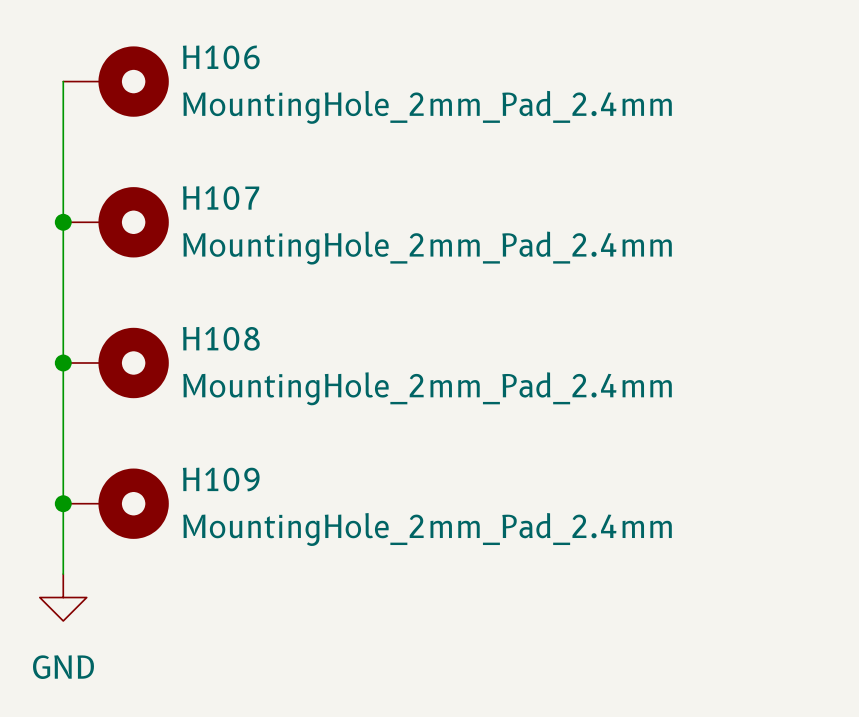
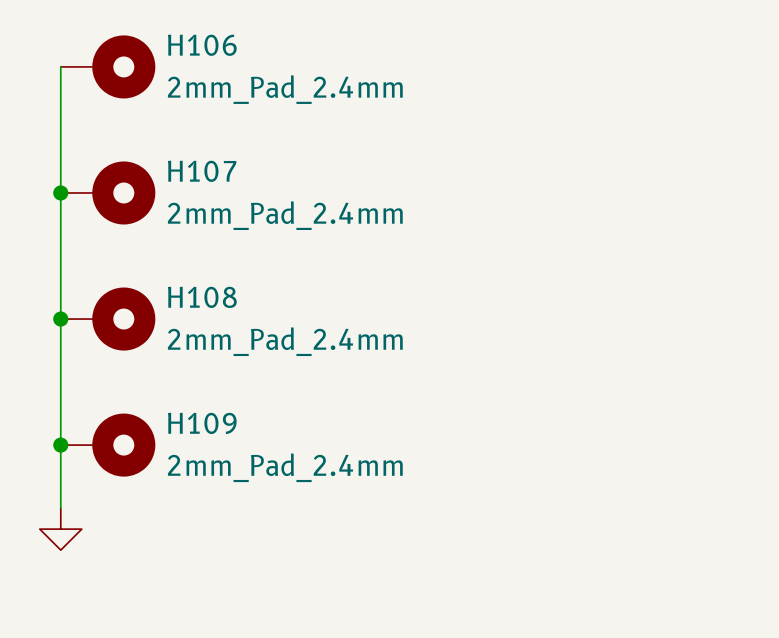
H106 value: MountingHole_2mm_Pad_2.4mm (427, 107) -> 2mm_Pad_2.4mm (285, 89)
H107 value: MountingHole_2mm_Pad_2.4mm (427, 248) -> 2mm_Pad_2.4mm (285, 215)
H108 value: MountingHole_2mm_Pad_2.4mm (427, 388) -> 2mm_Pad_2.4mm (285, 341)
H109 value: MountingHole_2mm_Pad_2.4mm (427, 529) -> 2mm_Pad_2.4mm (285, 467)
power symbol text: GND (63, 667) -> none

